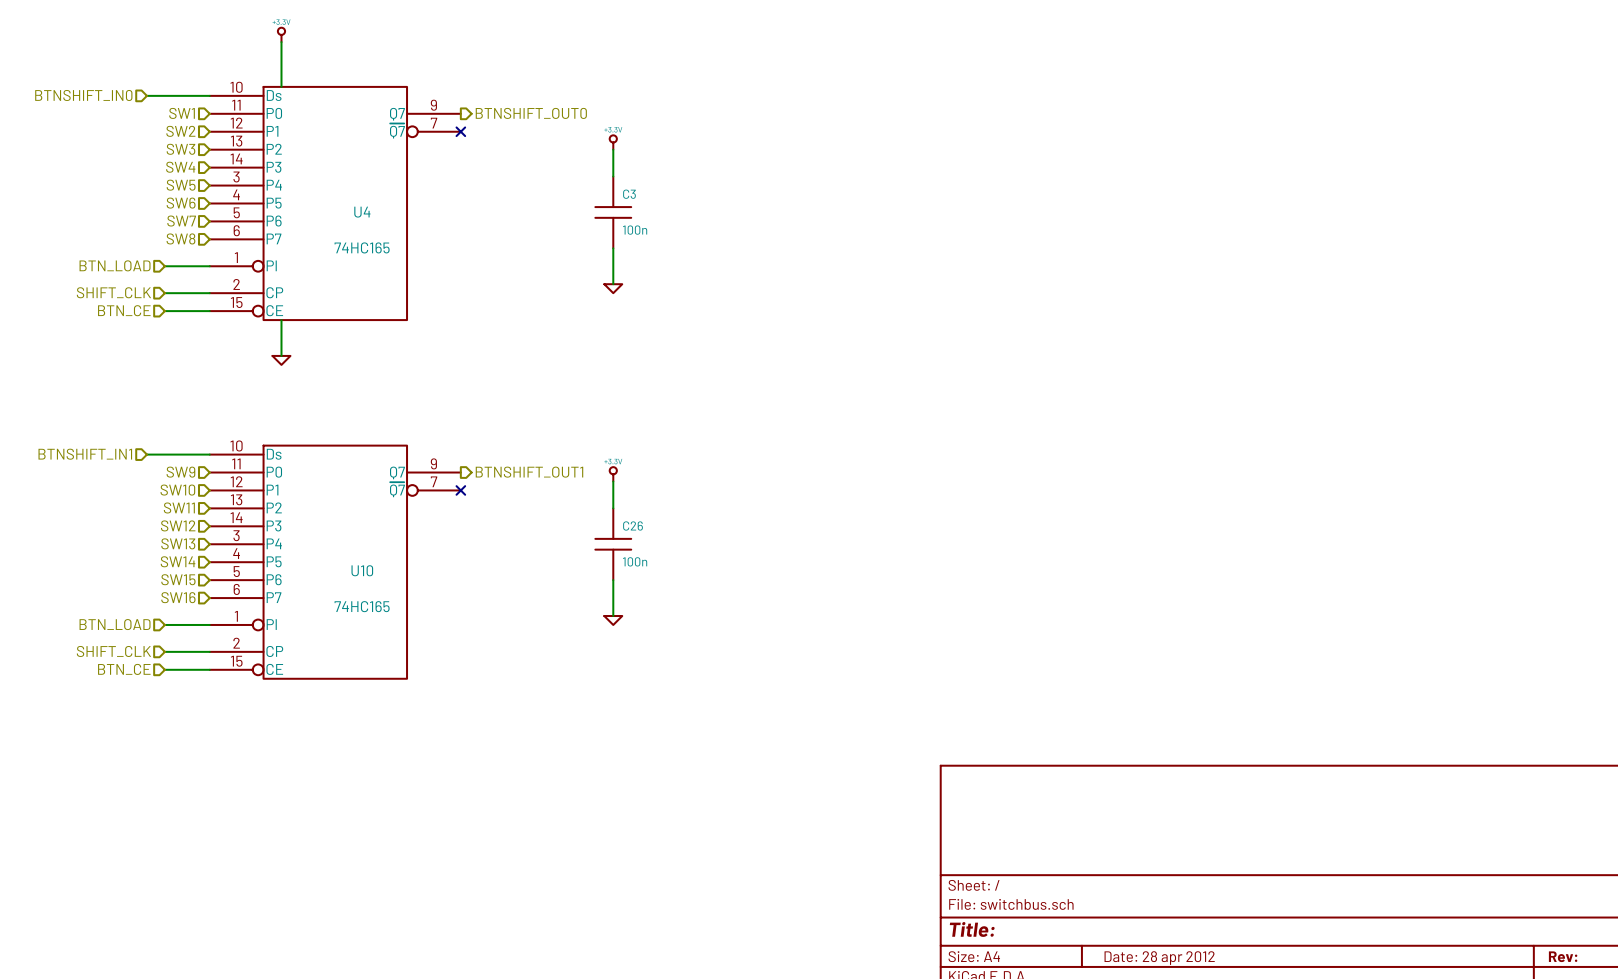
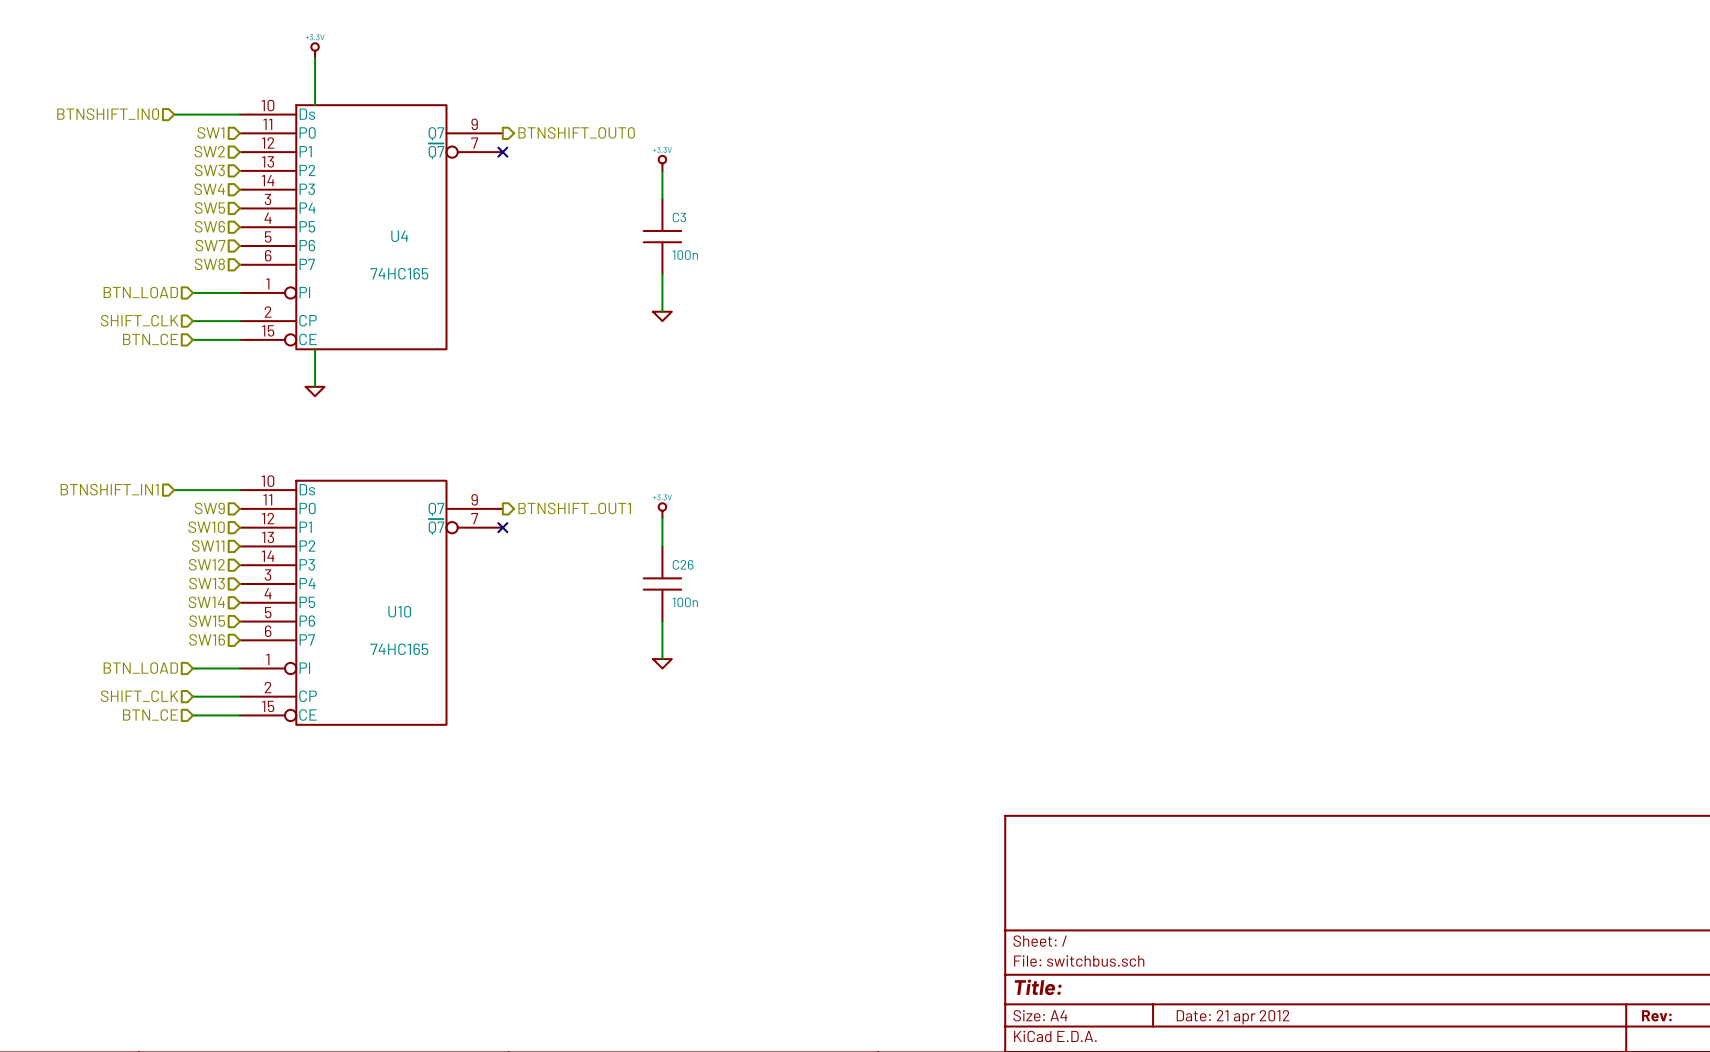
title block: Date: 28 apr 2012 (1159, 958) -> Date: 21 apr 2012 (1233, 1017)

